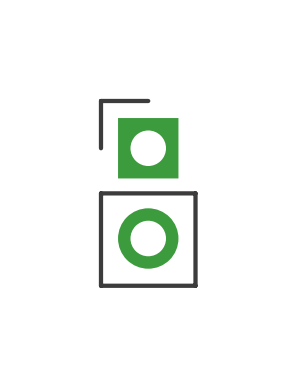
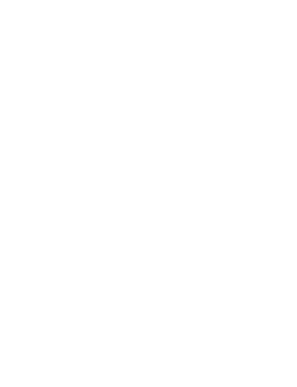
part: (148, 193) -> none

